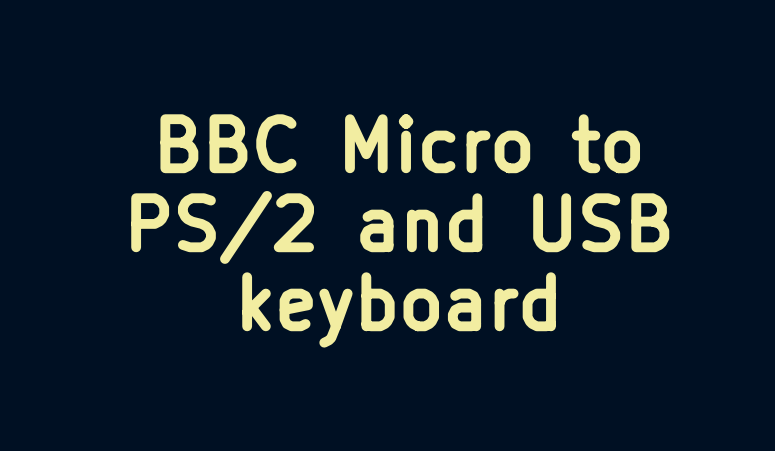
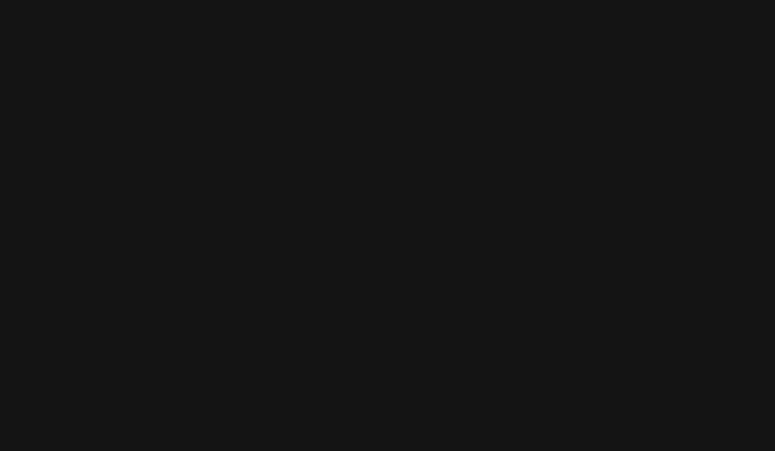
text: BBC Micro to (400, 143) -> none
text: PS/2 and USB (400, 227) -> none
text: keyboard (399, 309) -> none

